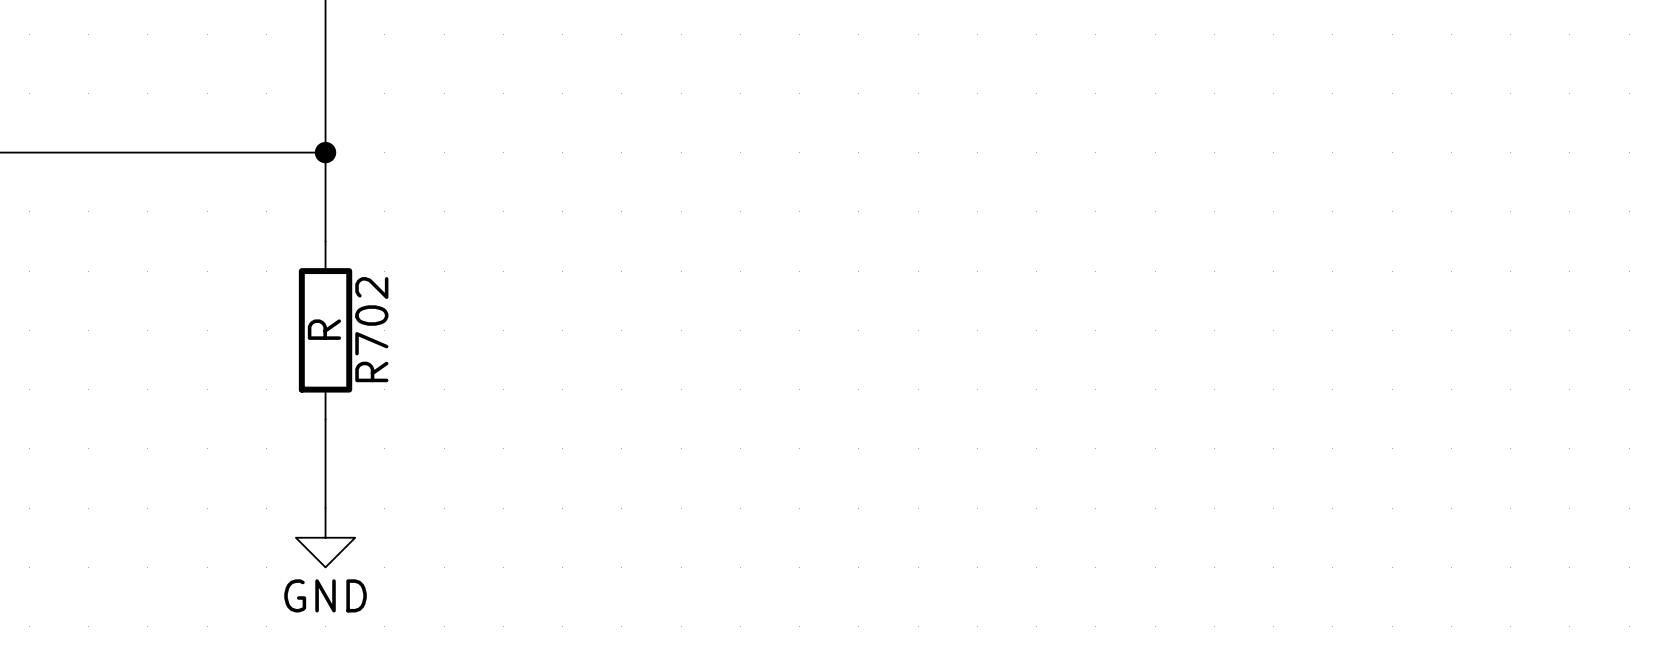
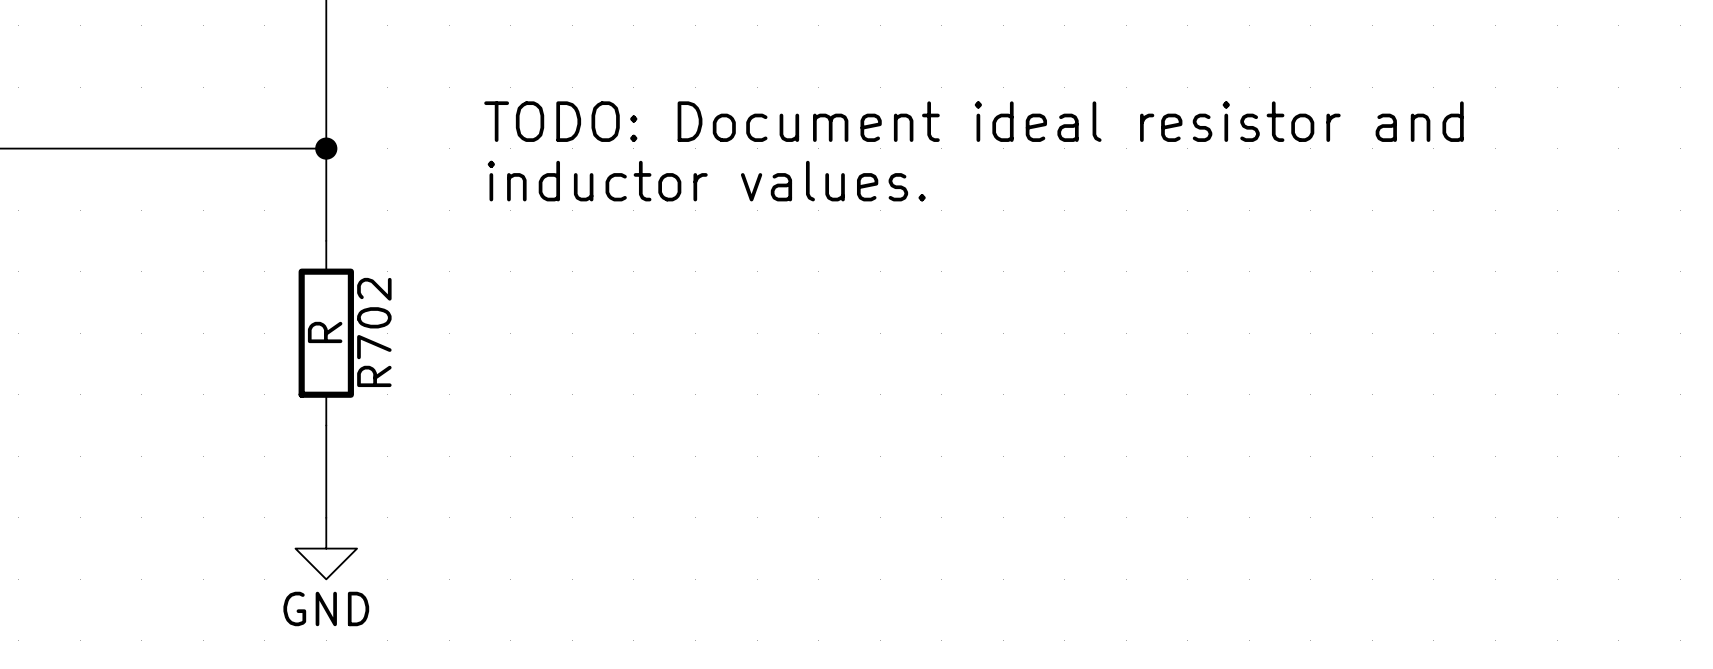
text: none -> TODO: Document ideal resistor and (973, 121)
text: none -> inductor values. (706, 181)

